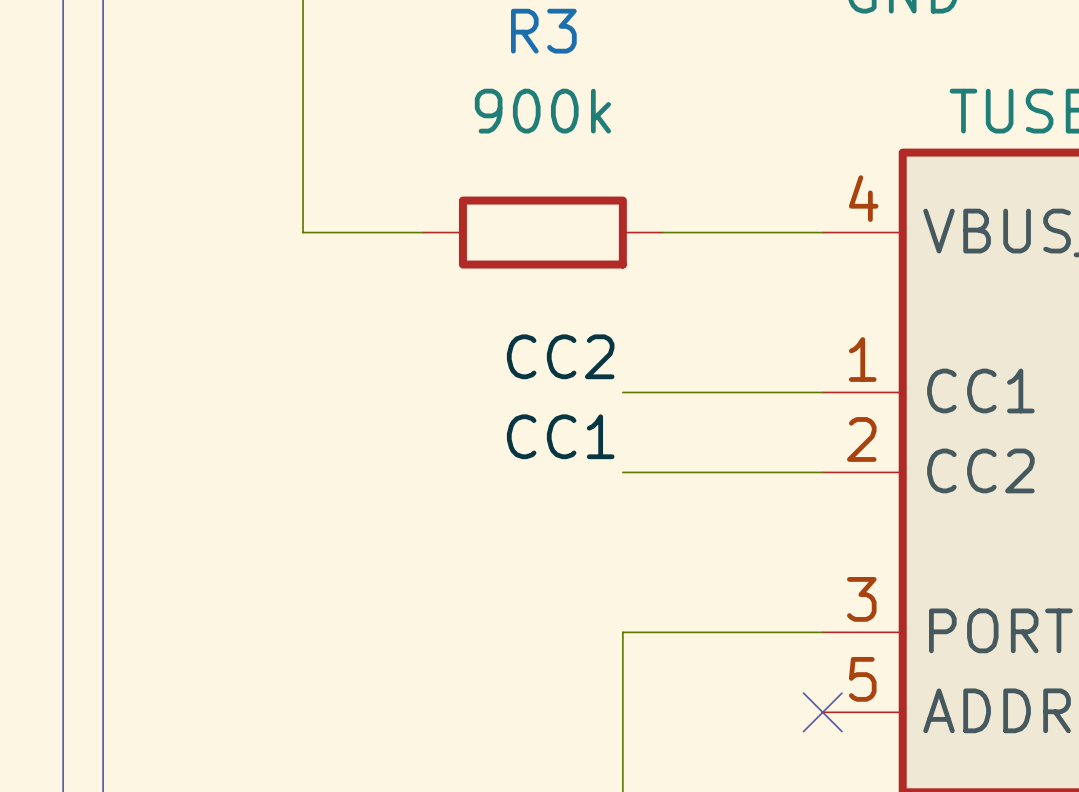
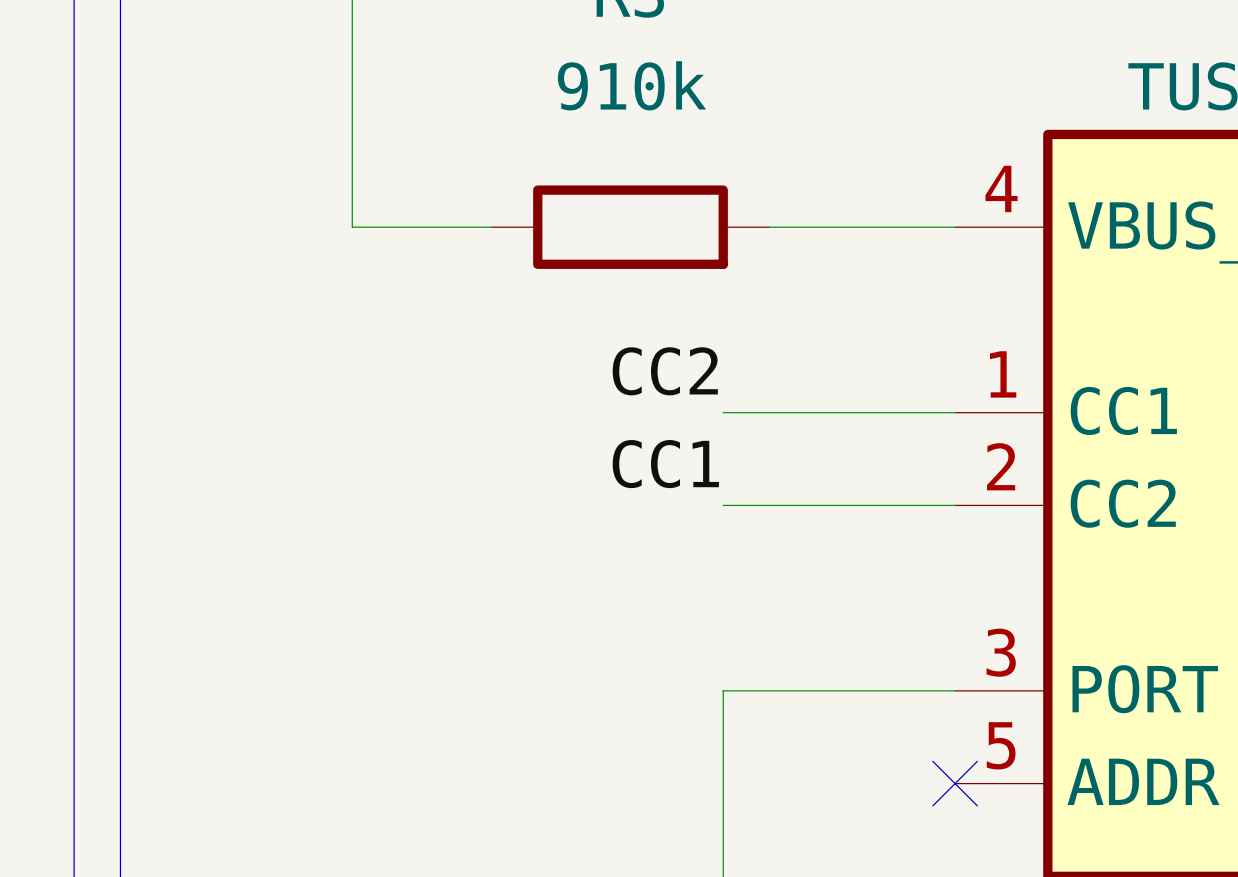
R3 value: 900k (542, 111) -> 910k (632, 85)

